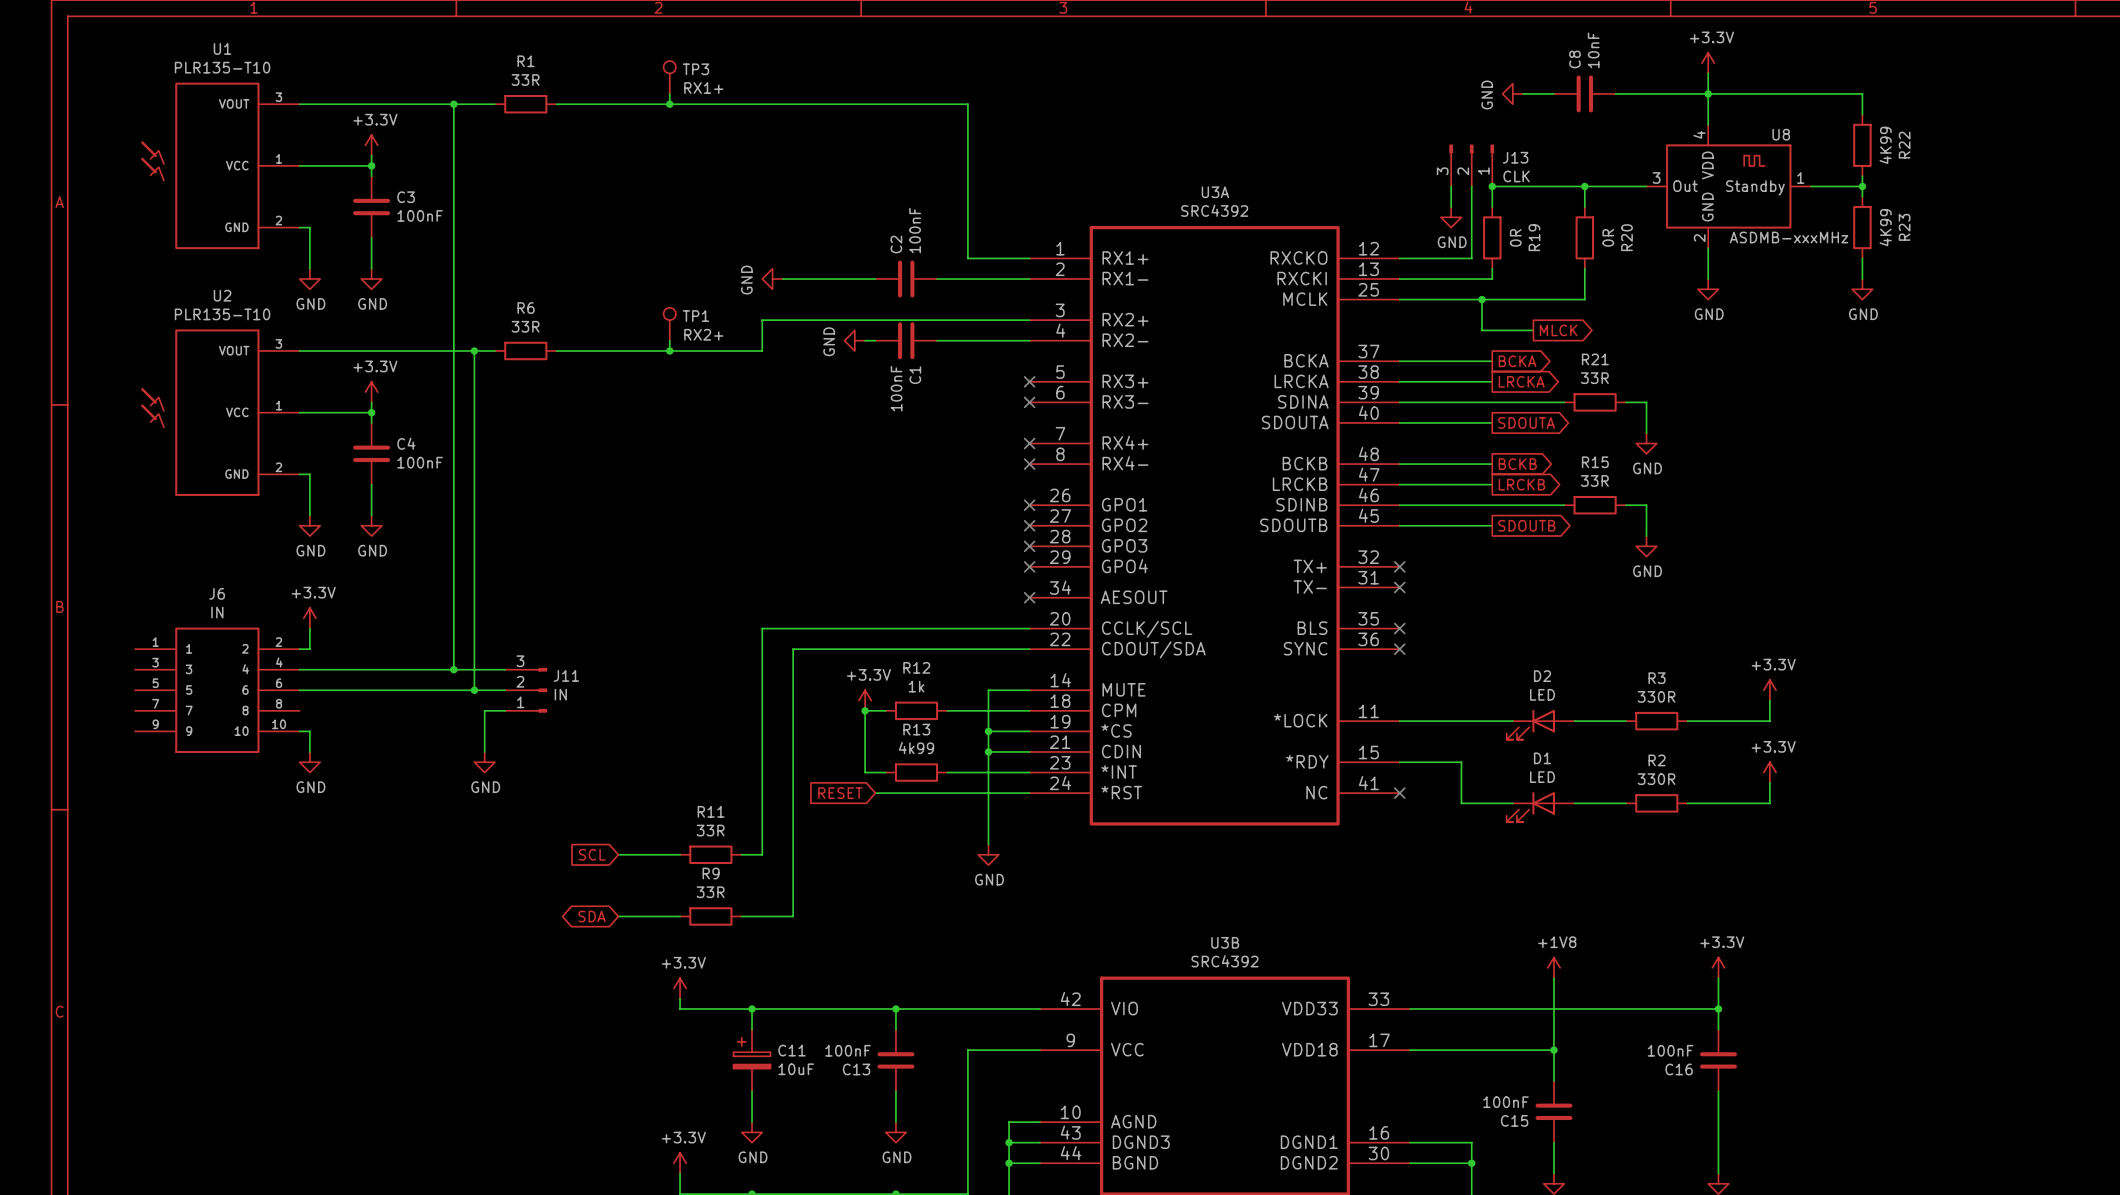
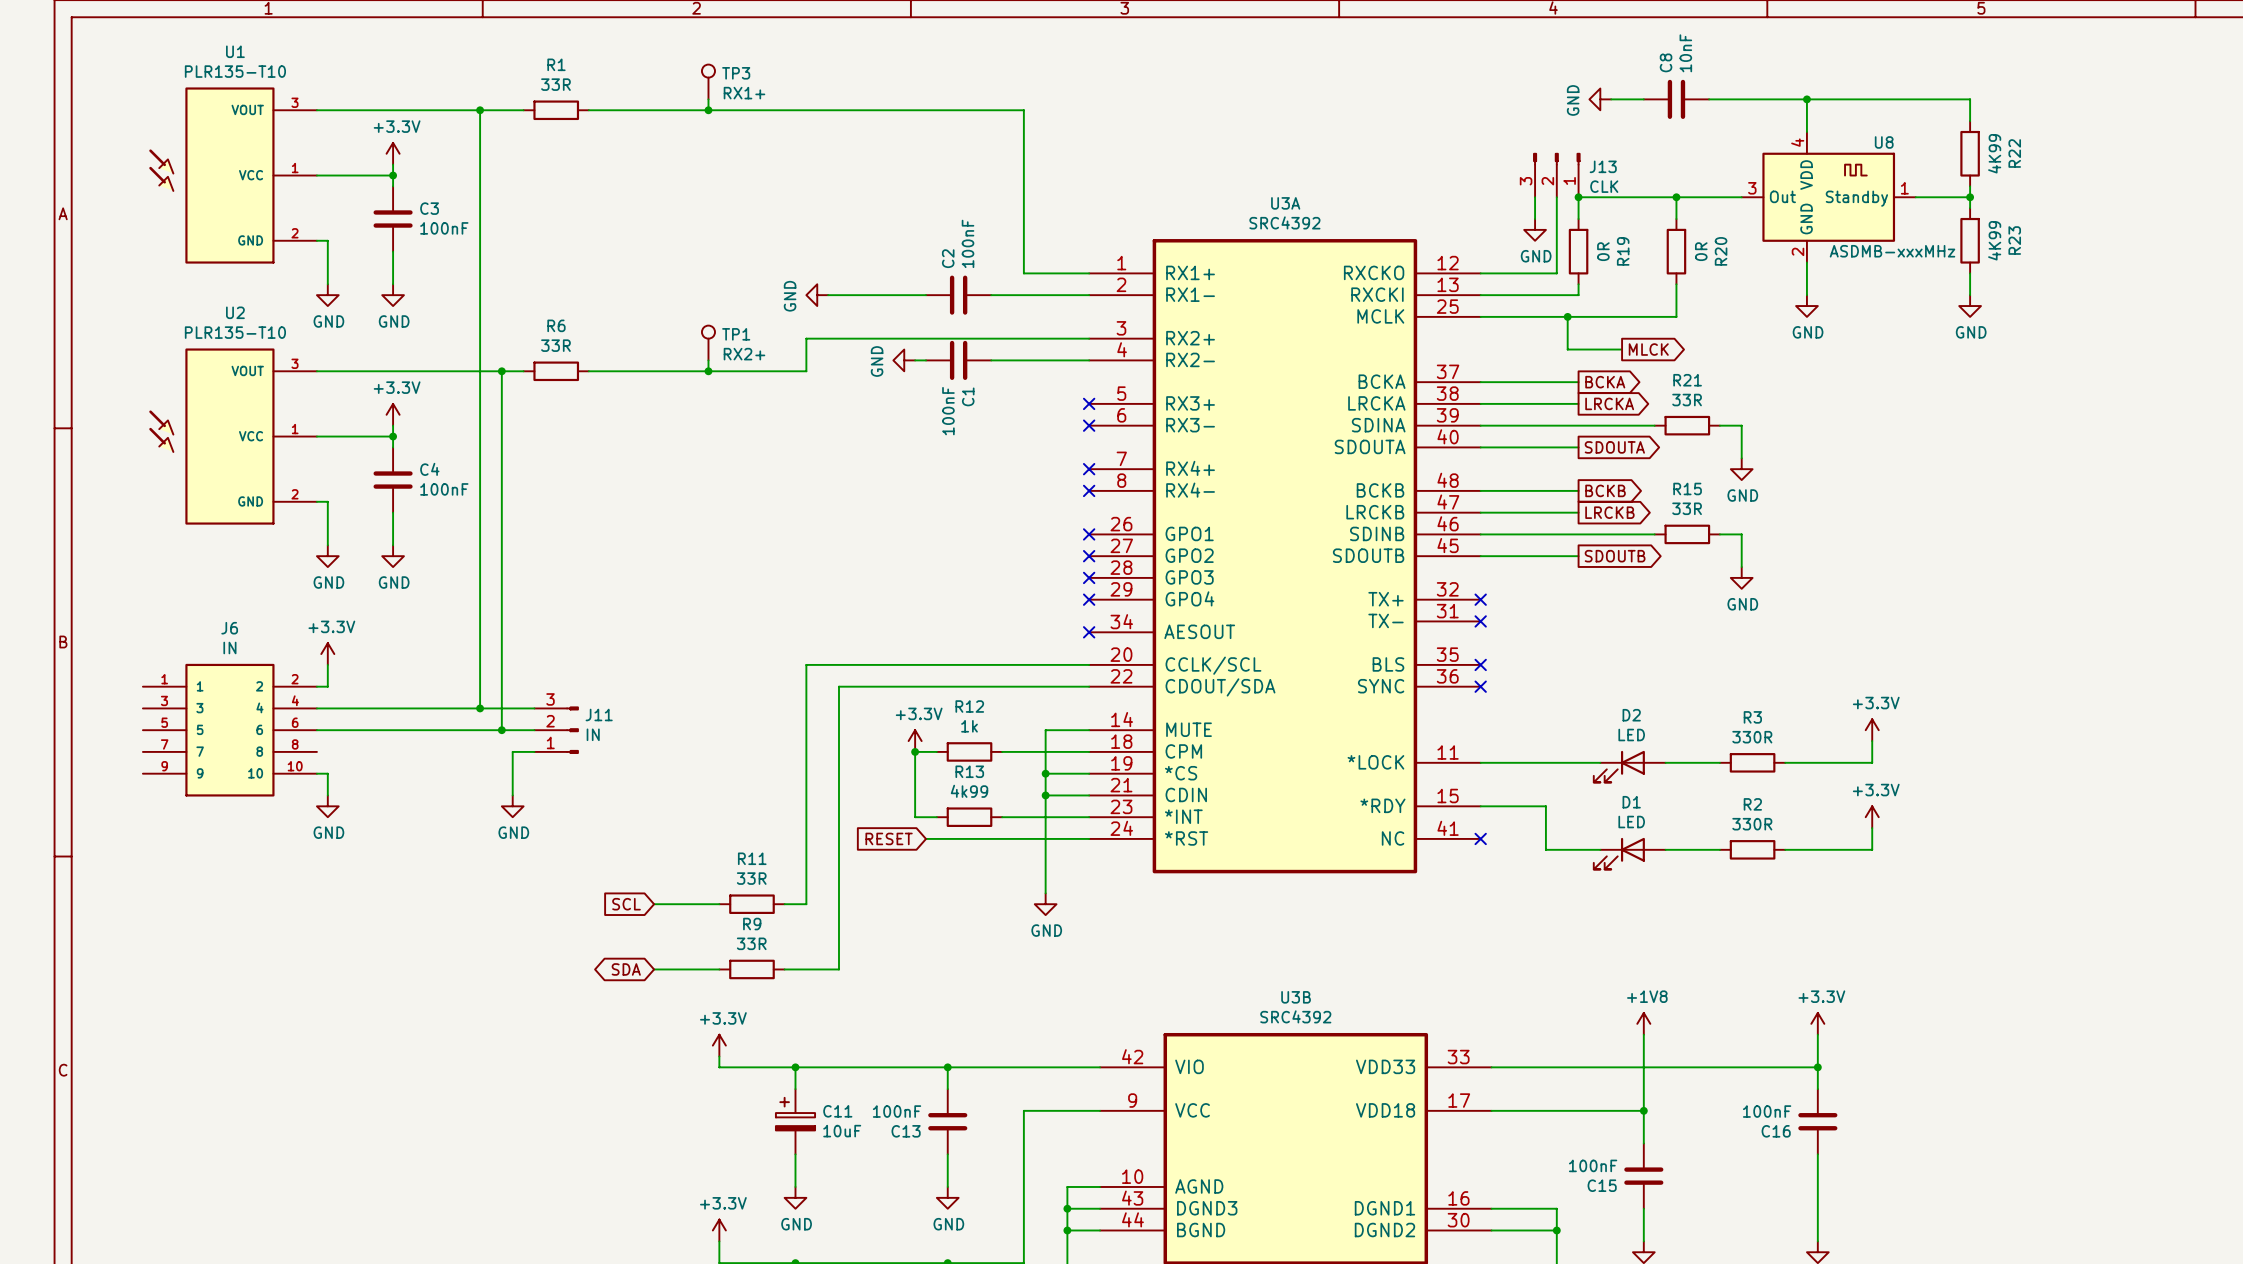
power symbol: +3.3V (1708, 63) -> none
wire: (1708, 73) (1708, 93) -> none

